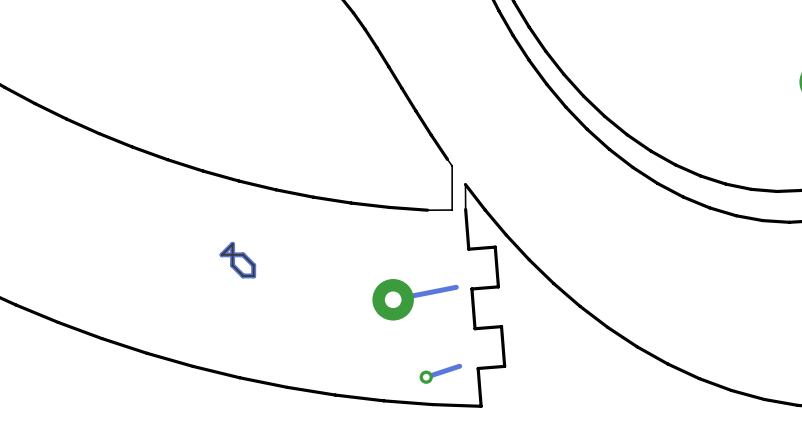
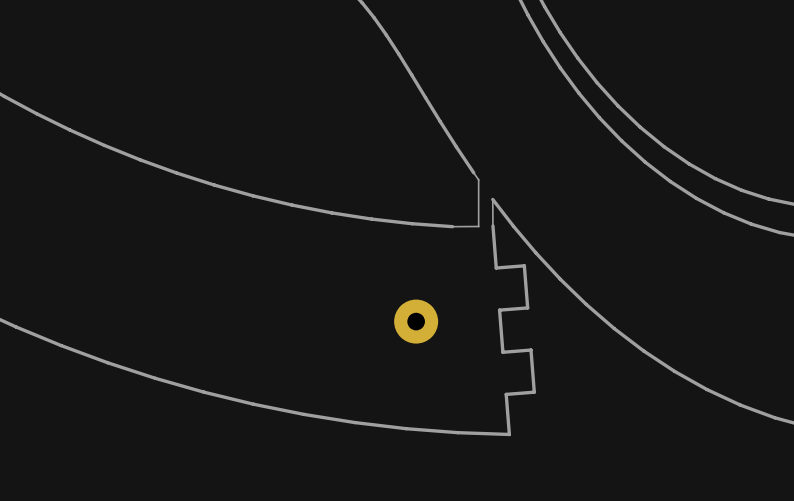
line: (232, 244) (232, 265) (243, 275) (253, 275) (253, 265) (243, 254) (222, 254) (232, 244) -> none
track: (232, 244) (232, 265) (243, 275) (253, 275) (253, 265) (243, 254) (222, 254) (232, 244) -> none
track: (456, 287) (393, 299) -> none
track: (459, 366) (426, 377) -> none
via: (426, 377) -> none

